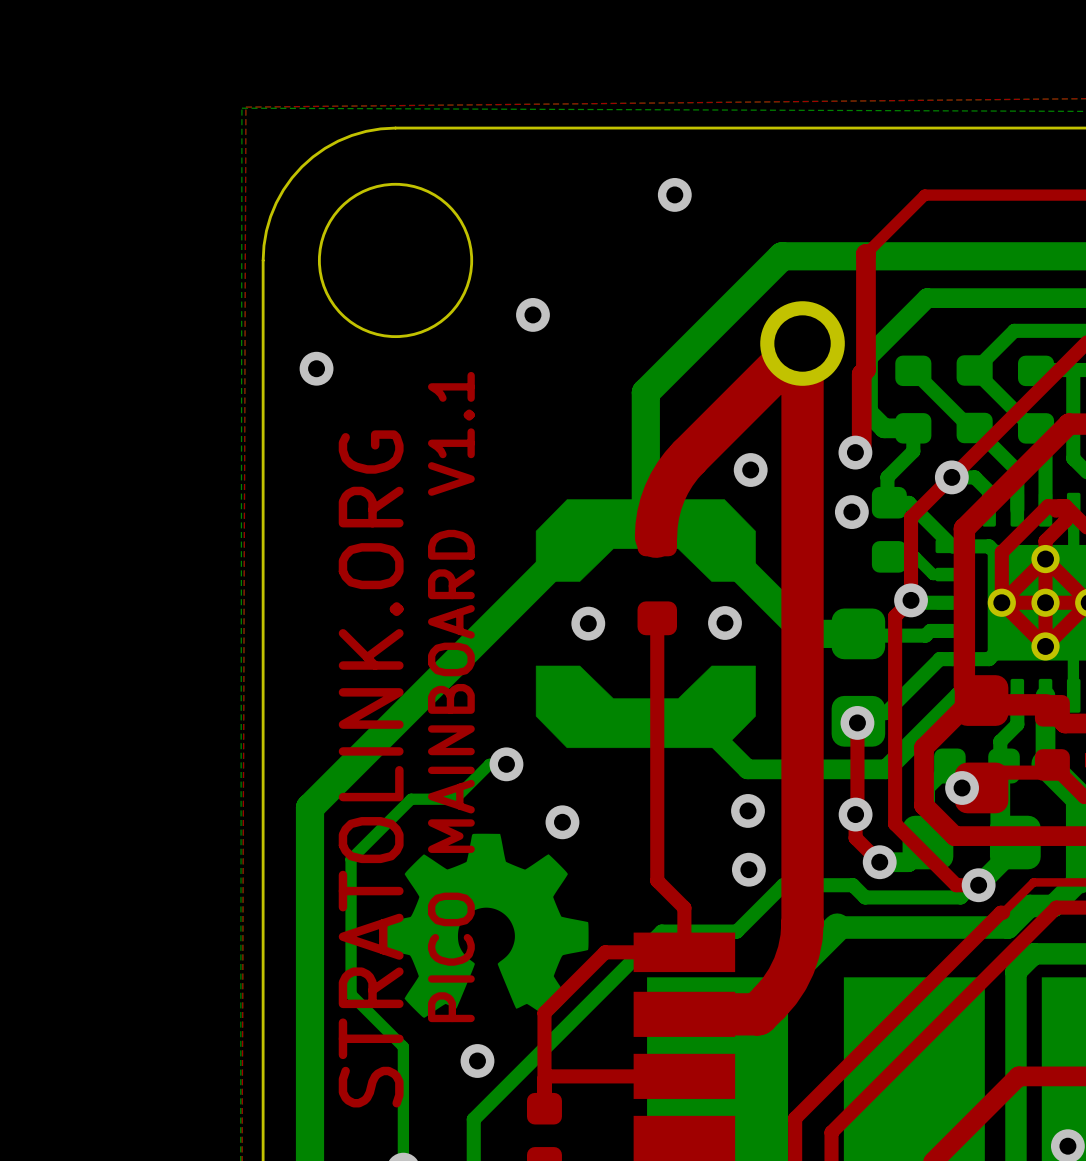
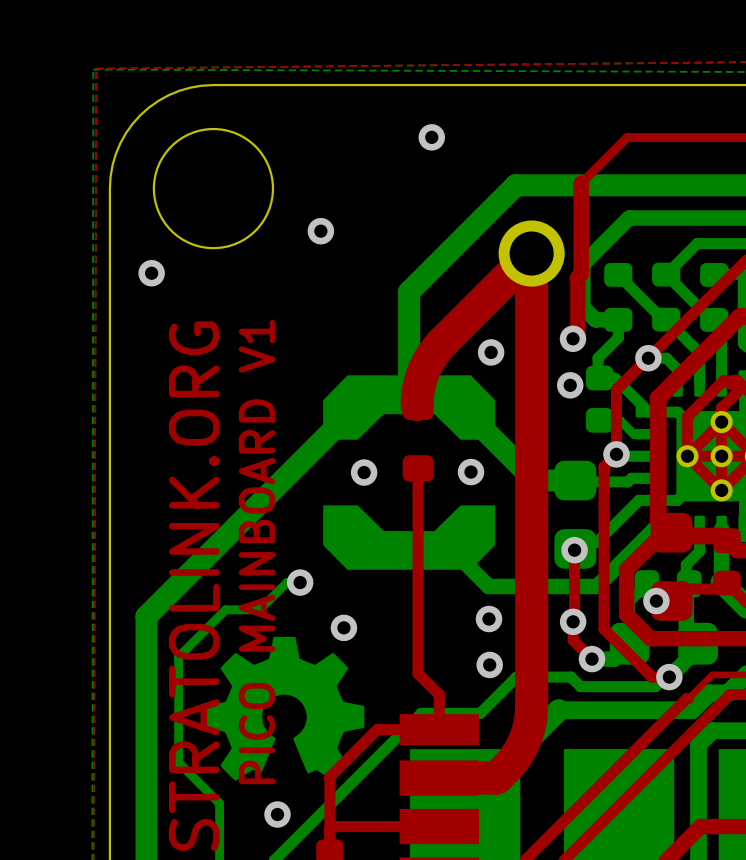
text: PICO MAINBOARD V1.1 (451, 697) -> PICO MAINBOARD V1 (257, 551)

